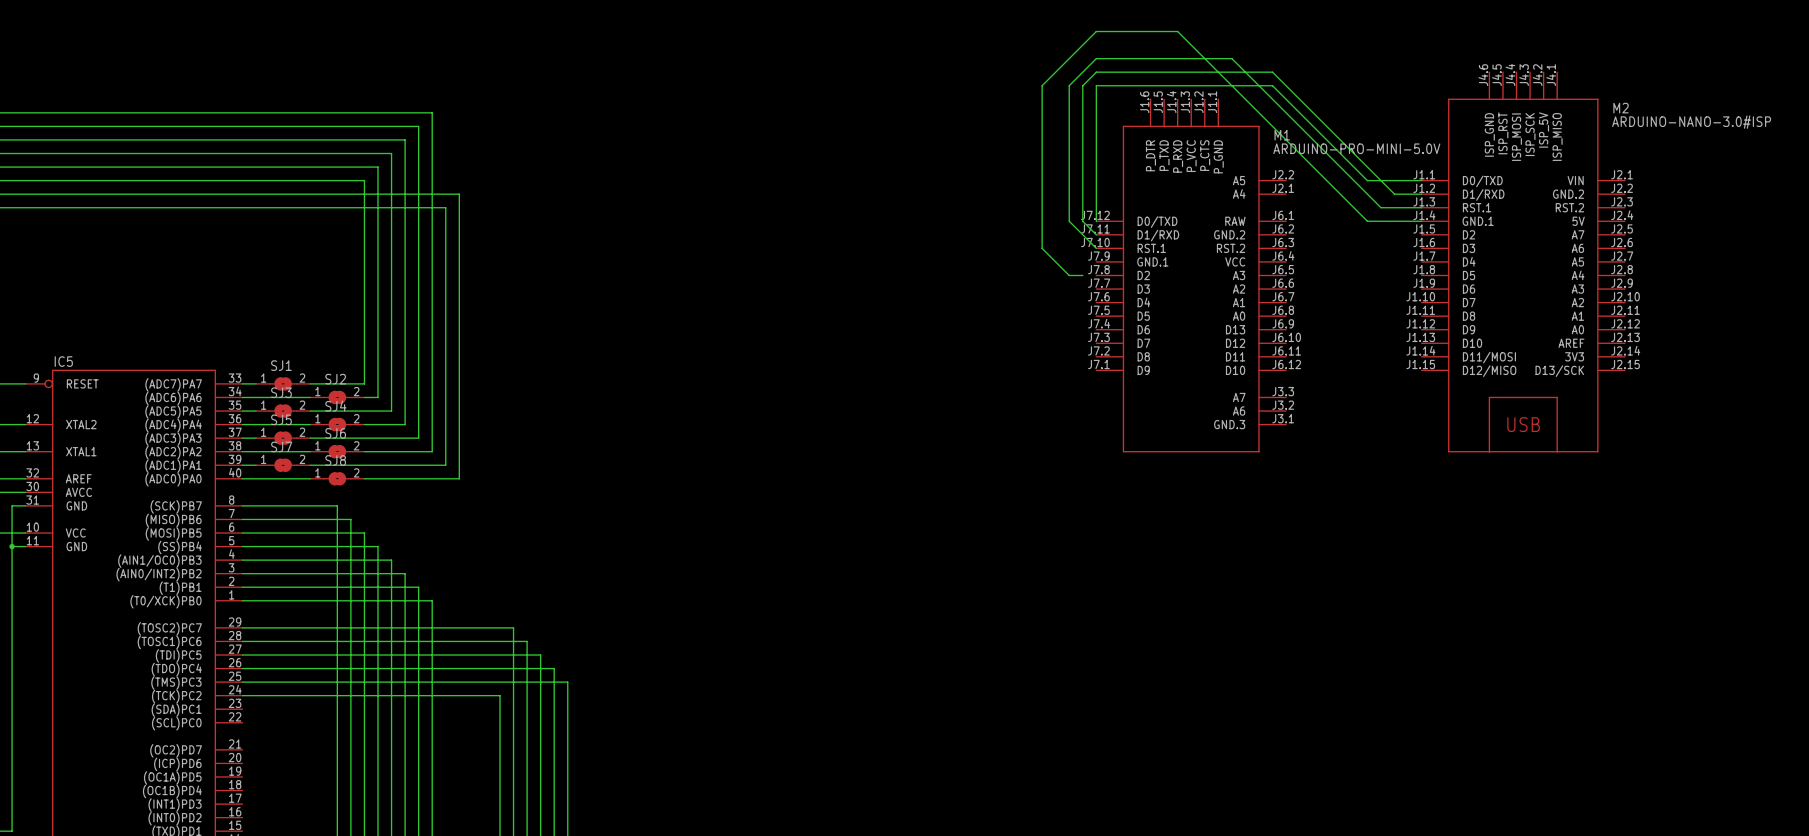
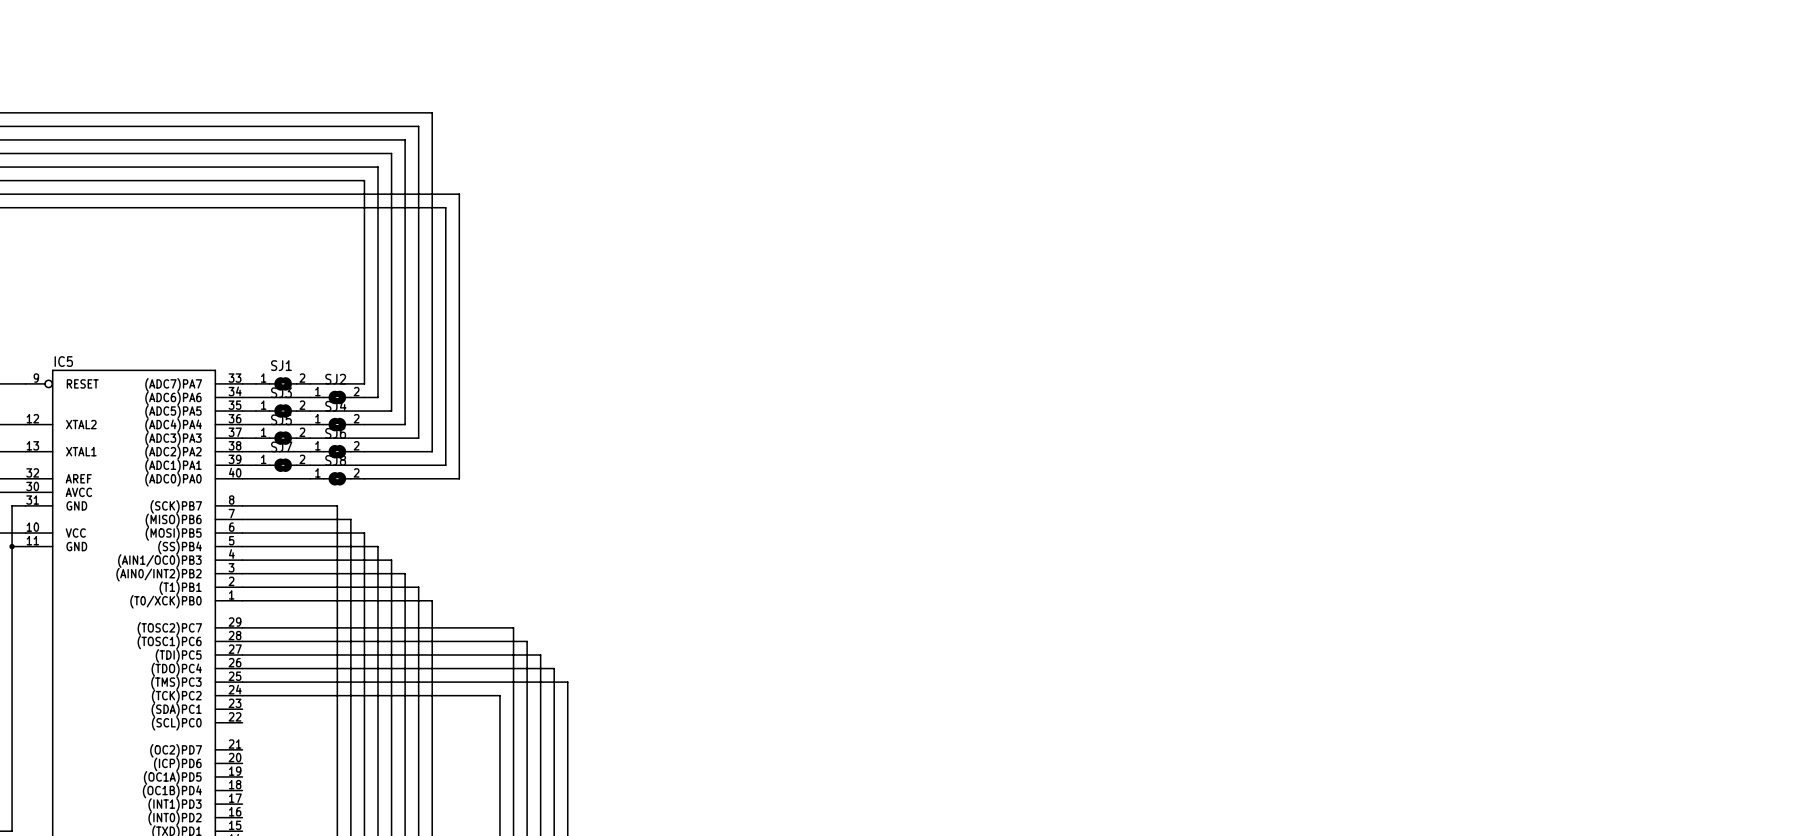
wire: (1421, 180) (1367, 180) (1272, 85) (1096, 85) (1096, 221) -> none
wire: (1421, 194) (1394, 194) (1272, 72) (1096, 72) (1082, 85) (1082, 221) (1096, 234) -> none
wire: (1421, 207) (1380, 207) (1231, 58) (1096, 58) (1069, 85) (1069, 221) (1096, 248) -> none
wire: (1421, 221) (1367, 221) (1177, 31) (1096, 31) (1042, 85) (1042, 248) (1069, 275) (1082, 275) -> none
M2: ARDUINO-NANO-3.0#ISP (1523, 262) -> none
M1: ARDUINO-PRO-MINI-5.0V (1191, 275) -> none

